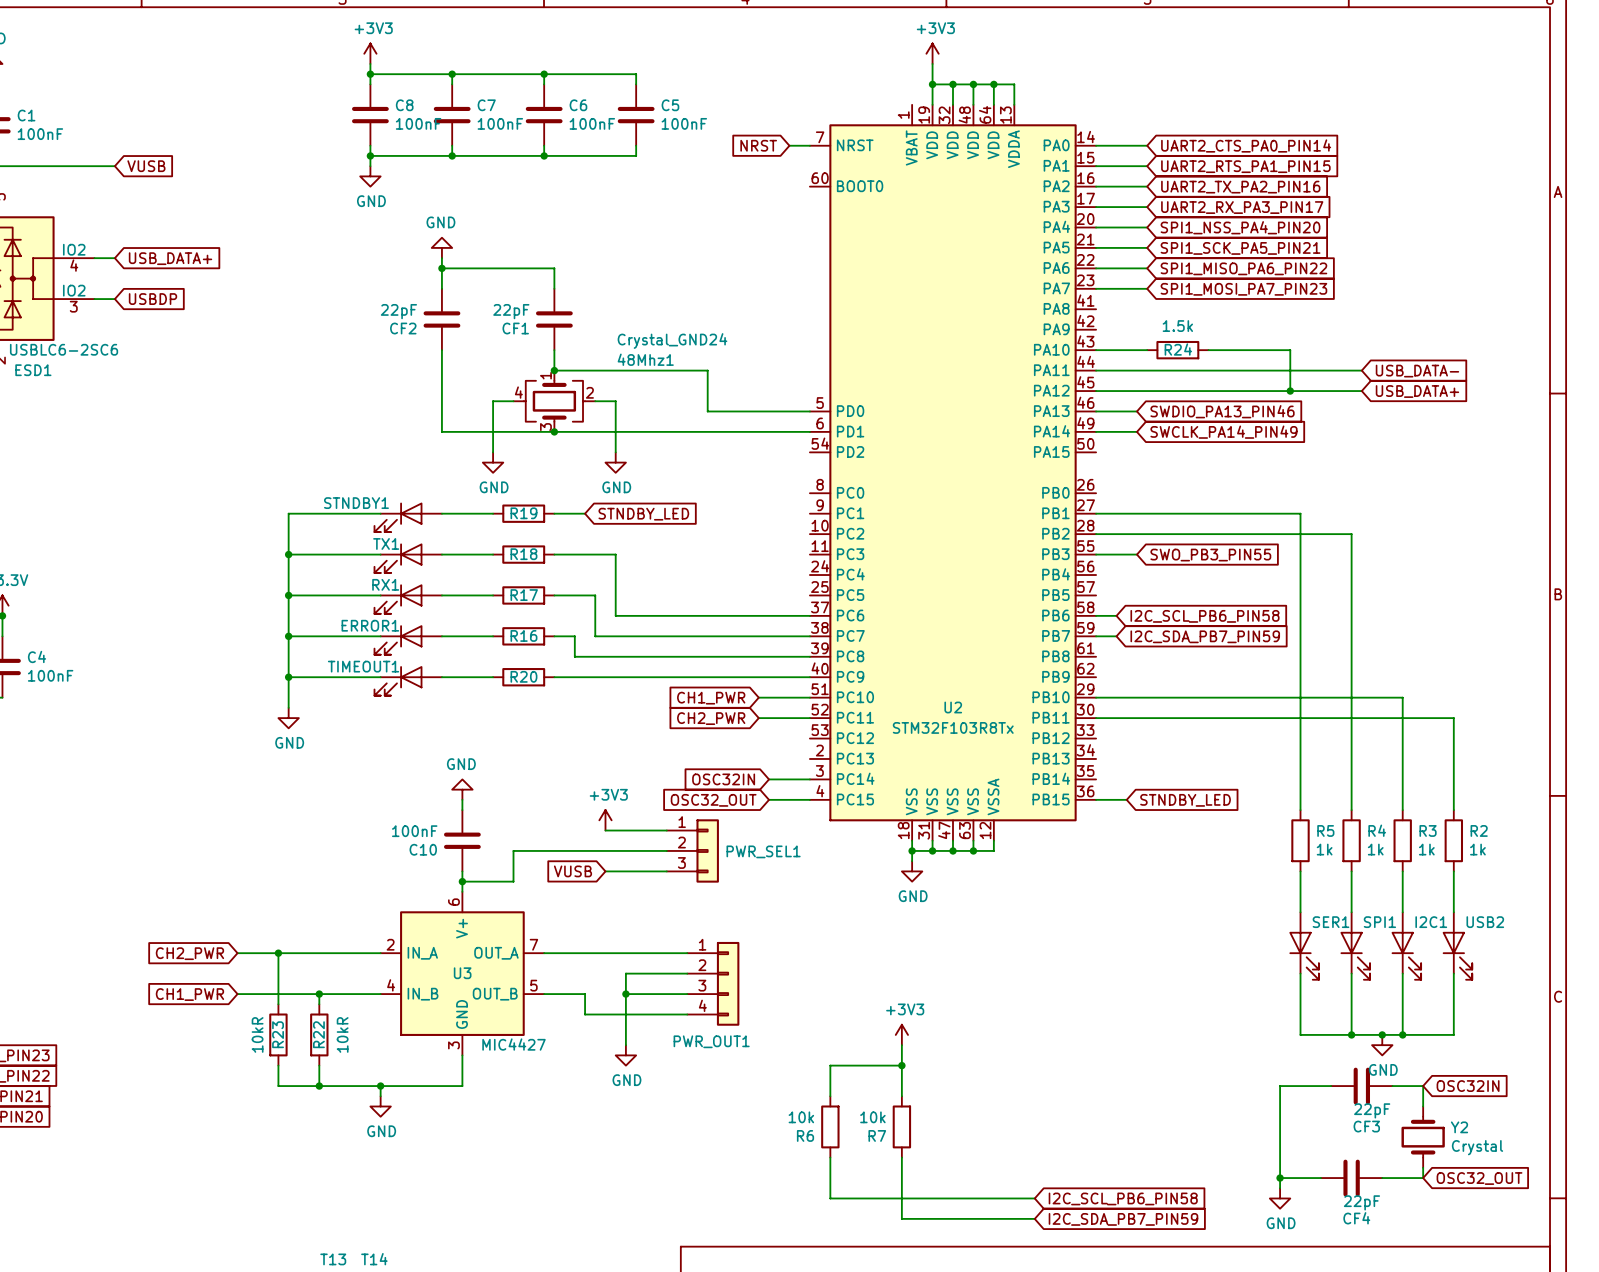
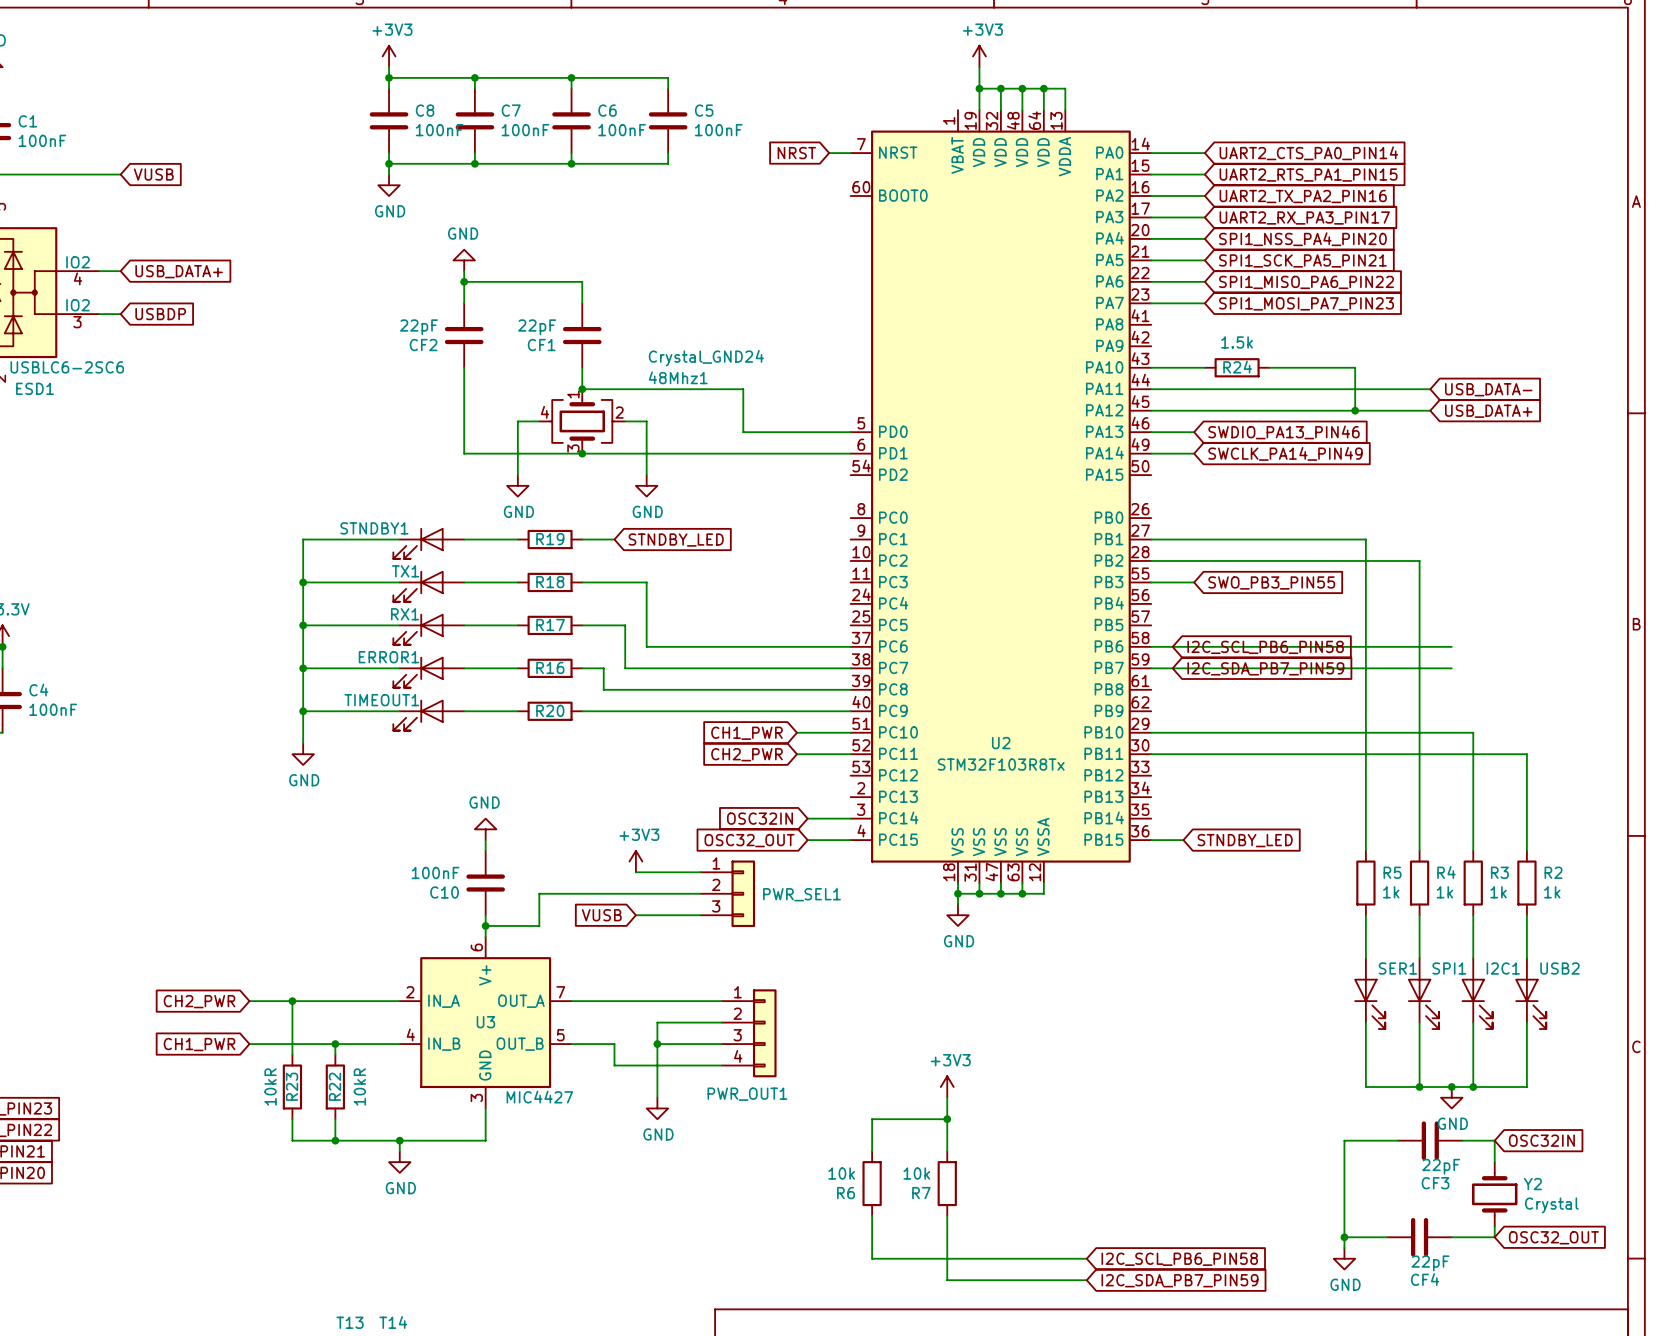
wire: none -> (1172, 646) (1451, 646)
wire: none -> (1172, 668) (1451, 668)

